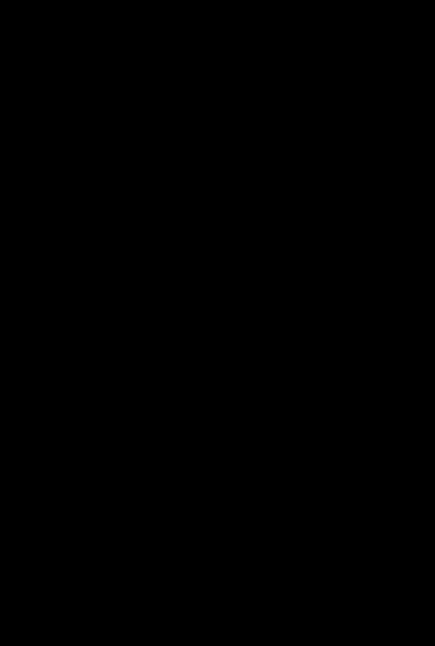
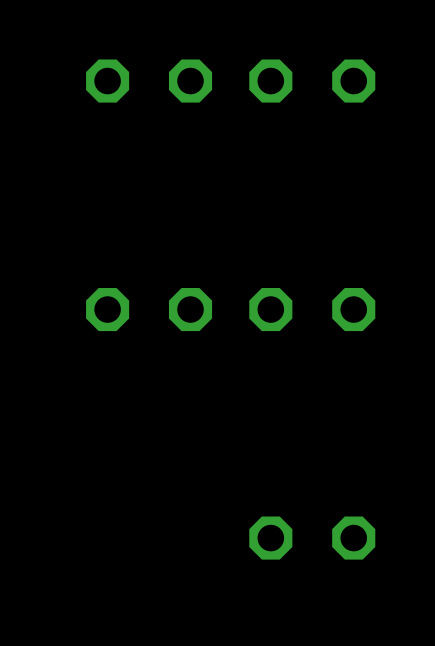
part: none -> (149, 81)
part: none -> (312, 81)
part: none -> (149, 309)
part: none -> (312, 309)
part: none -> (312, 538)

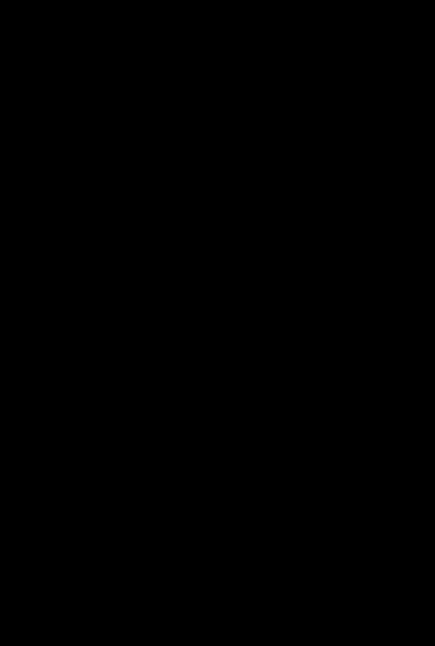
part: (149, 81) -> none
part: (312, 81) -> none
part: (149, 309) -> none
part: (312, 309) -> none
part: (312, 538) -> none

